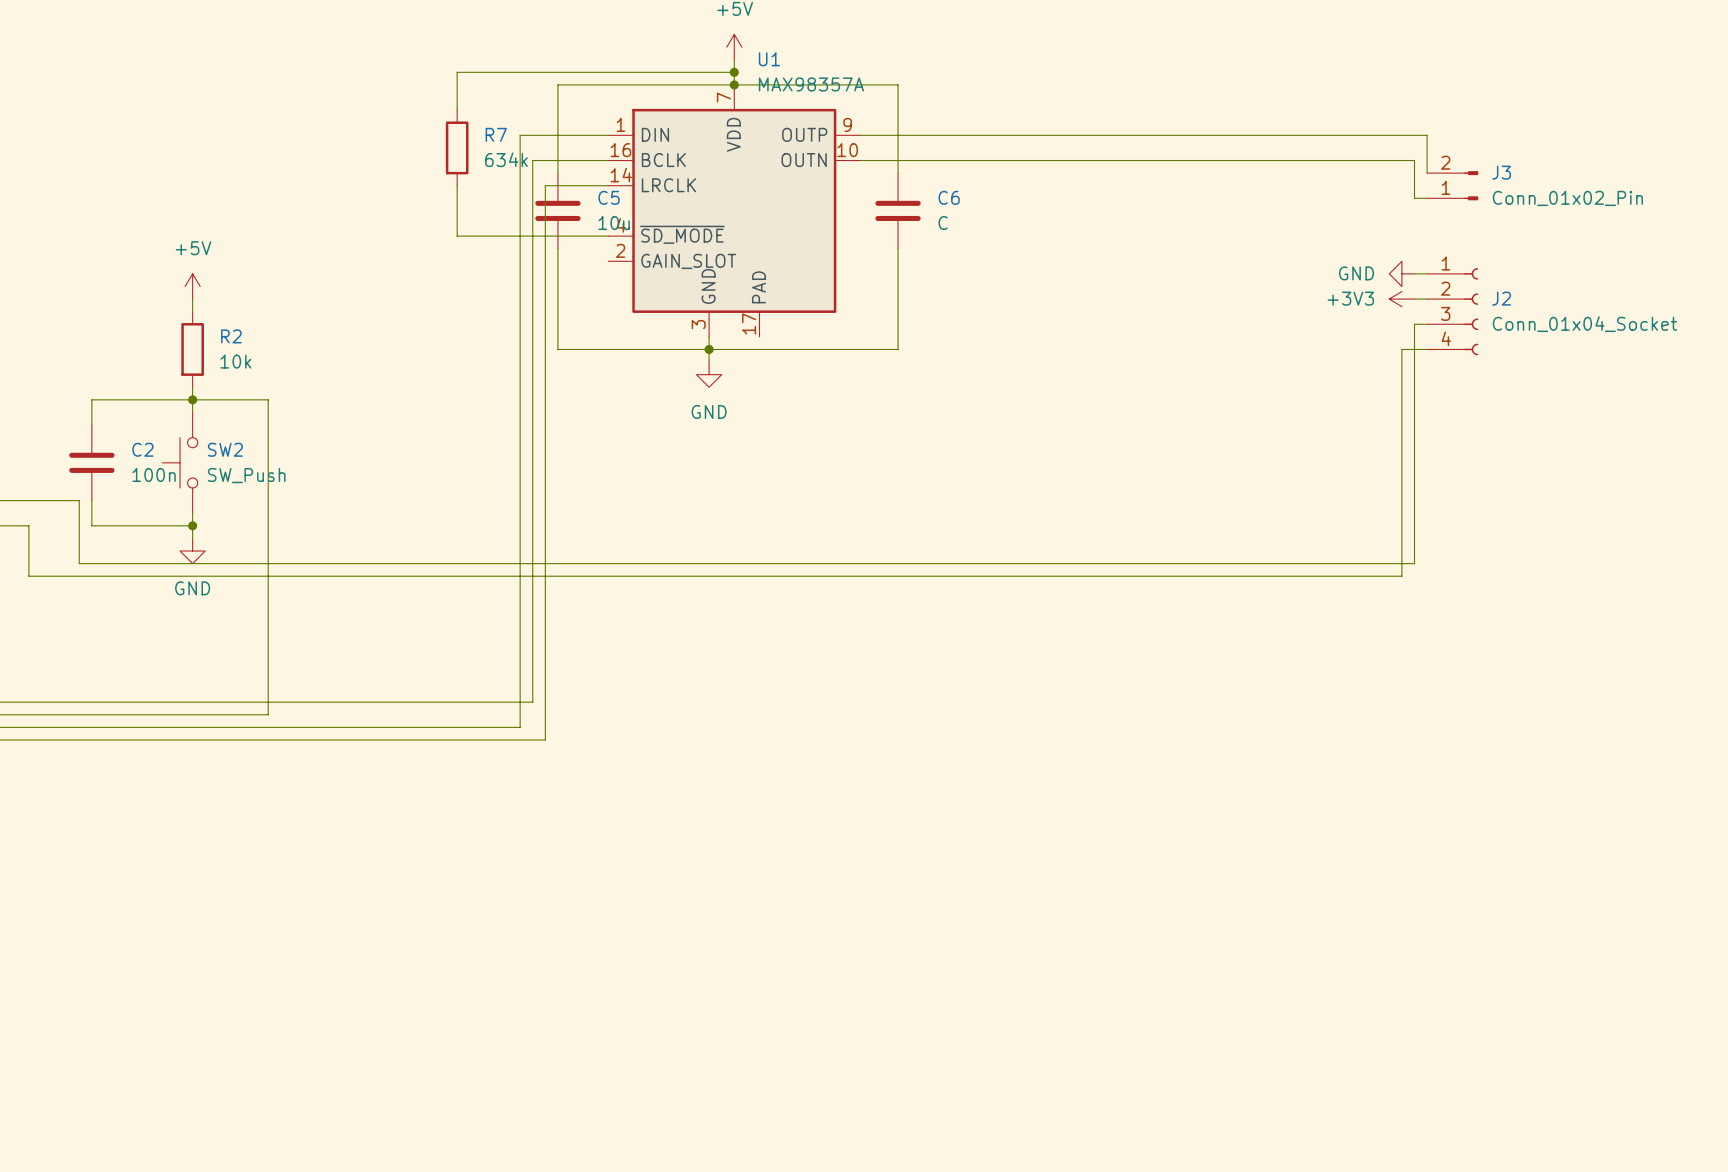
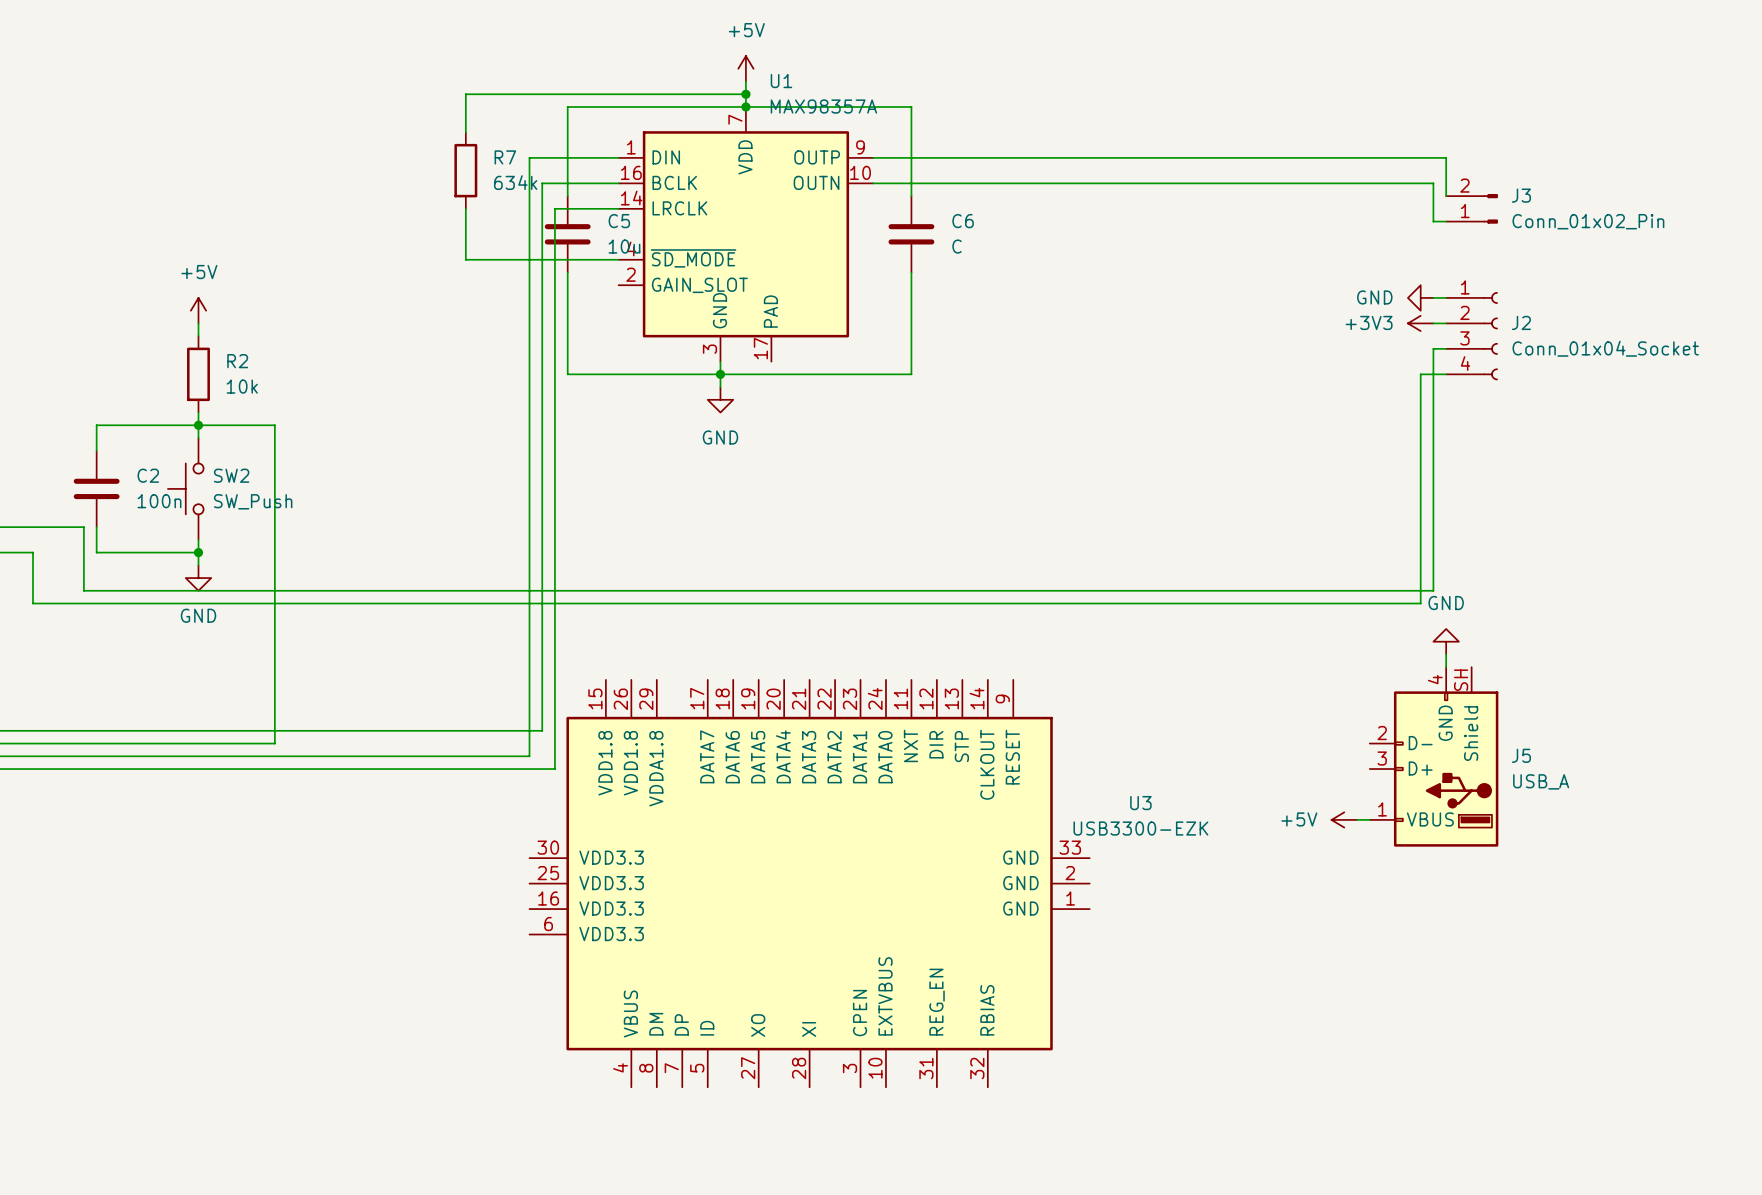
power symbol: none -> GND (1446, 641)
wire: none -> (1446, 654) (1446, 667)
J5: none -> USB_A (1434, 756)
power symbol: none -> +5V (1344, 819)
wire: none -> (1357, 819) (1369, 819)
U3: none -> USB3300-EZK (809, 883)

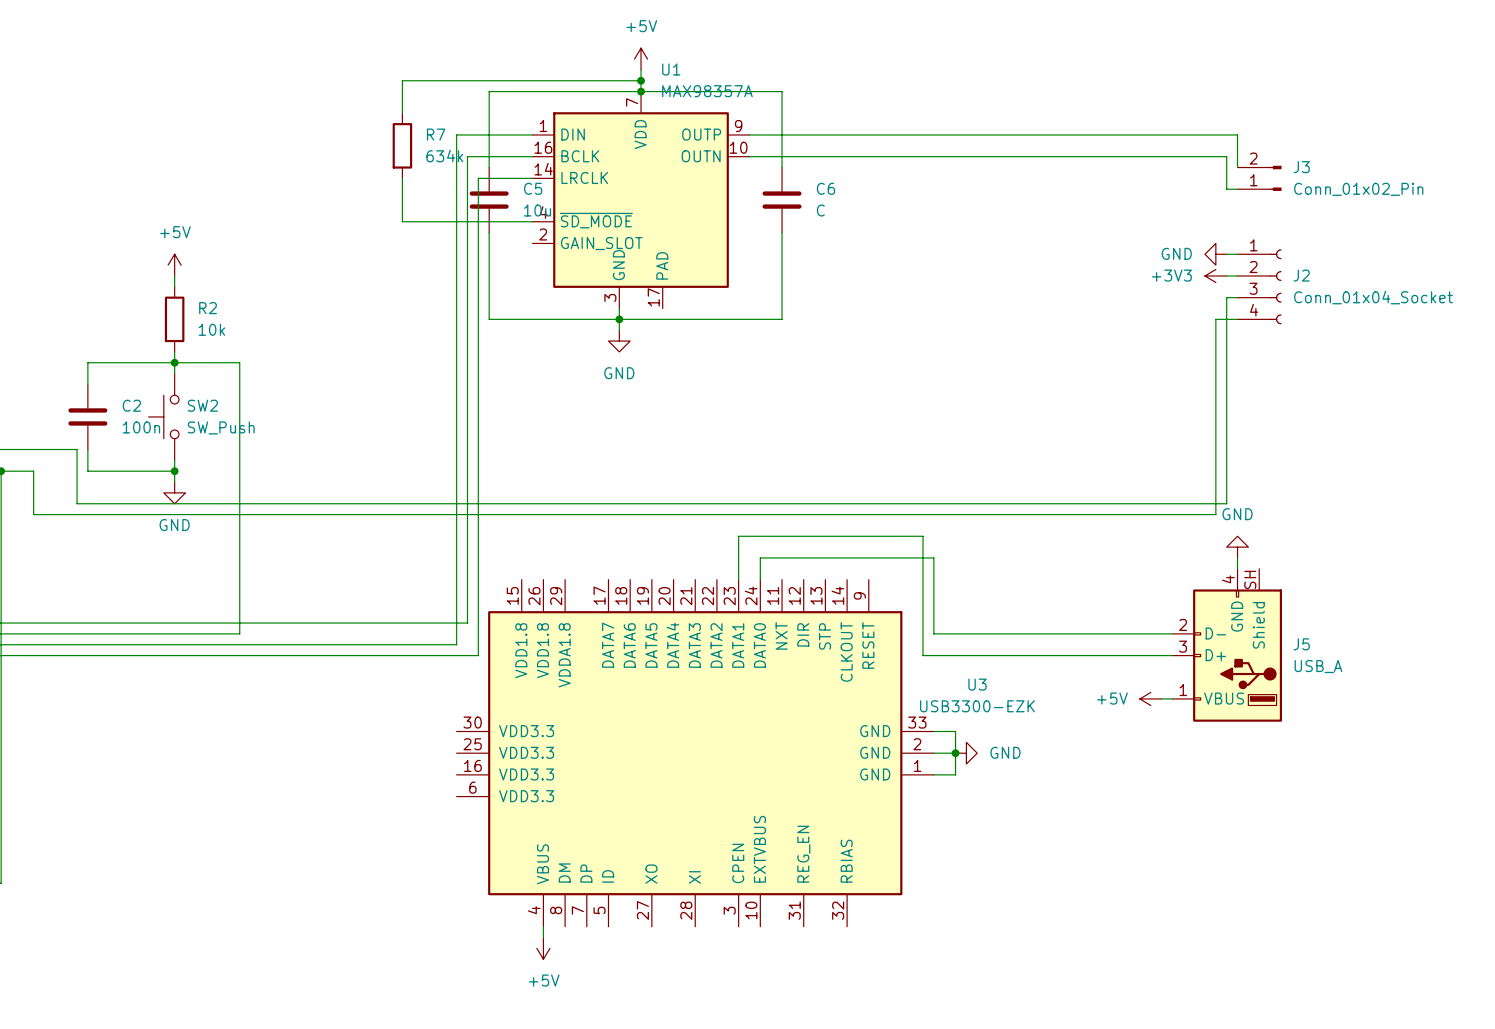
wire: none -> (738, 579) (738, 536) (923, 536) (923, 655) (1172, 655)
wire: none -> (760, 579) (760, 557) (933, 557) (933, 633) (1172, 633)
wire: none -> (933, 731) (955, 731) (955, 774) (933, 774)
wire: none -> (933, 753) (955, 753)
junction: none -> (955, 753)
power symbol: none -> GND (966, 753)
wire: none -> (543, 926) (543, 937)
power symbol: none -> +5V (543, 948)

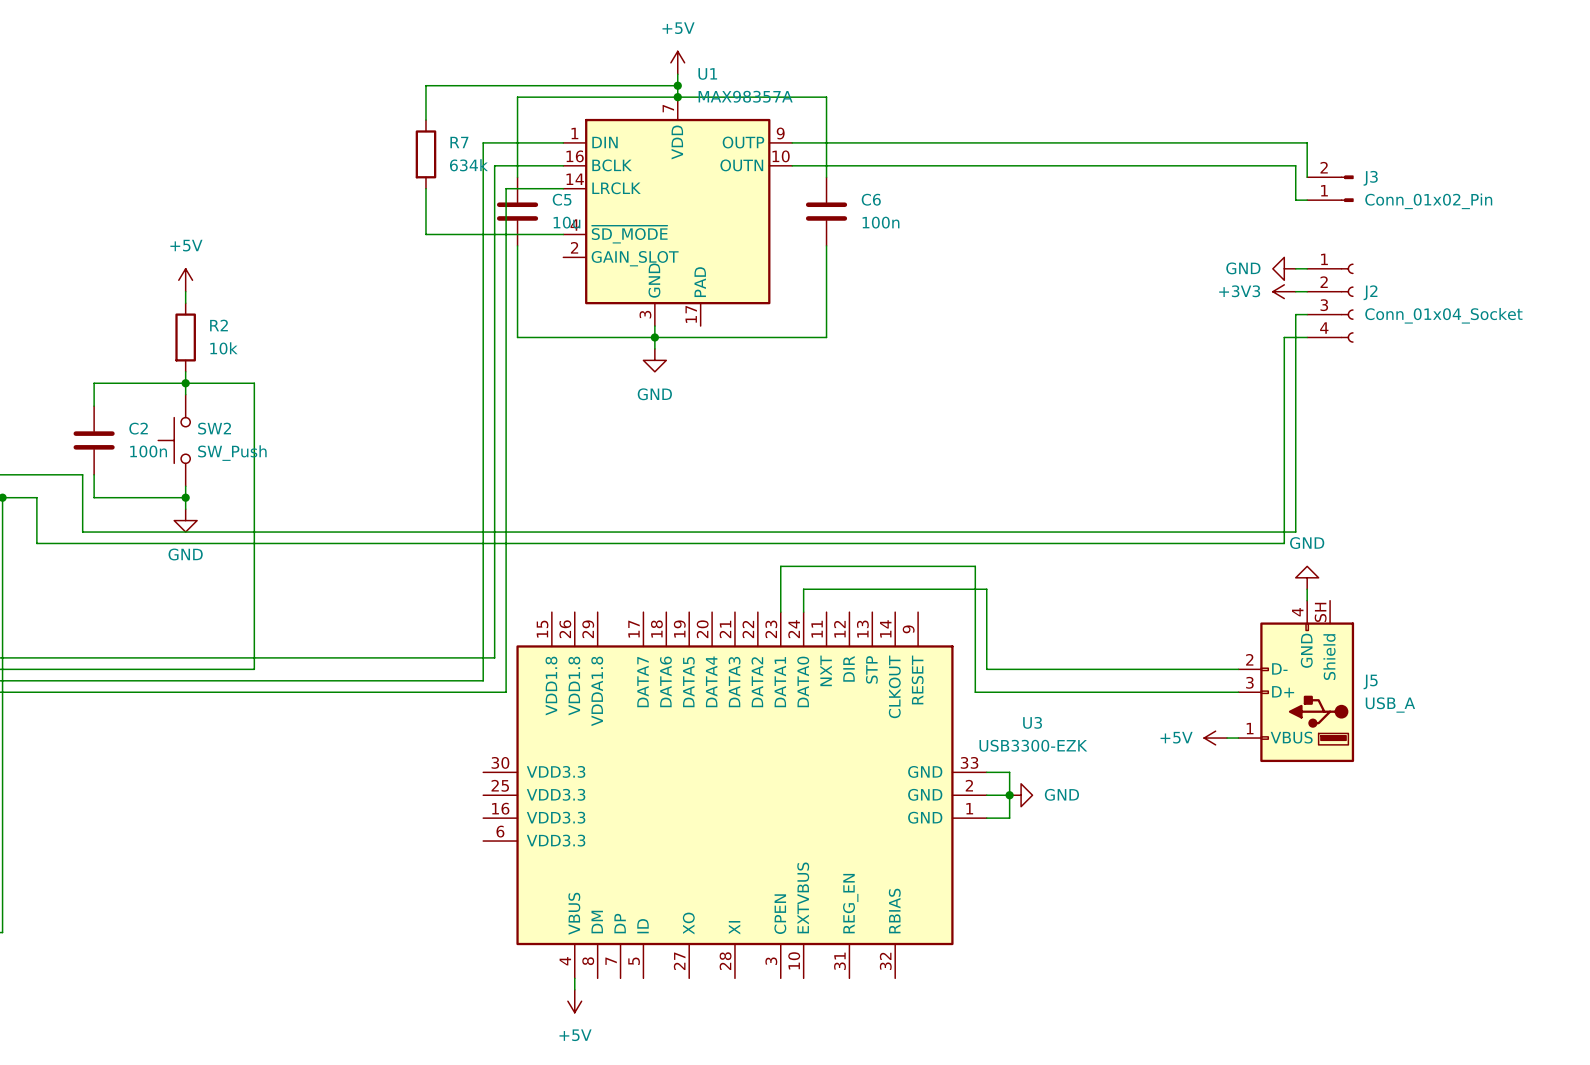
C6 value: C (820, 210) -> 100n (881, 222)

